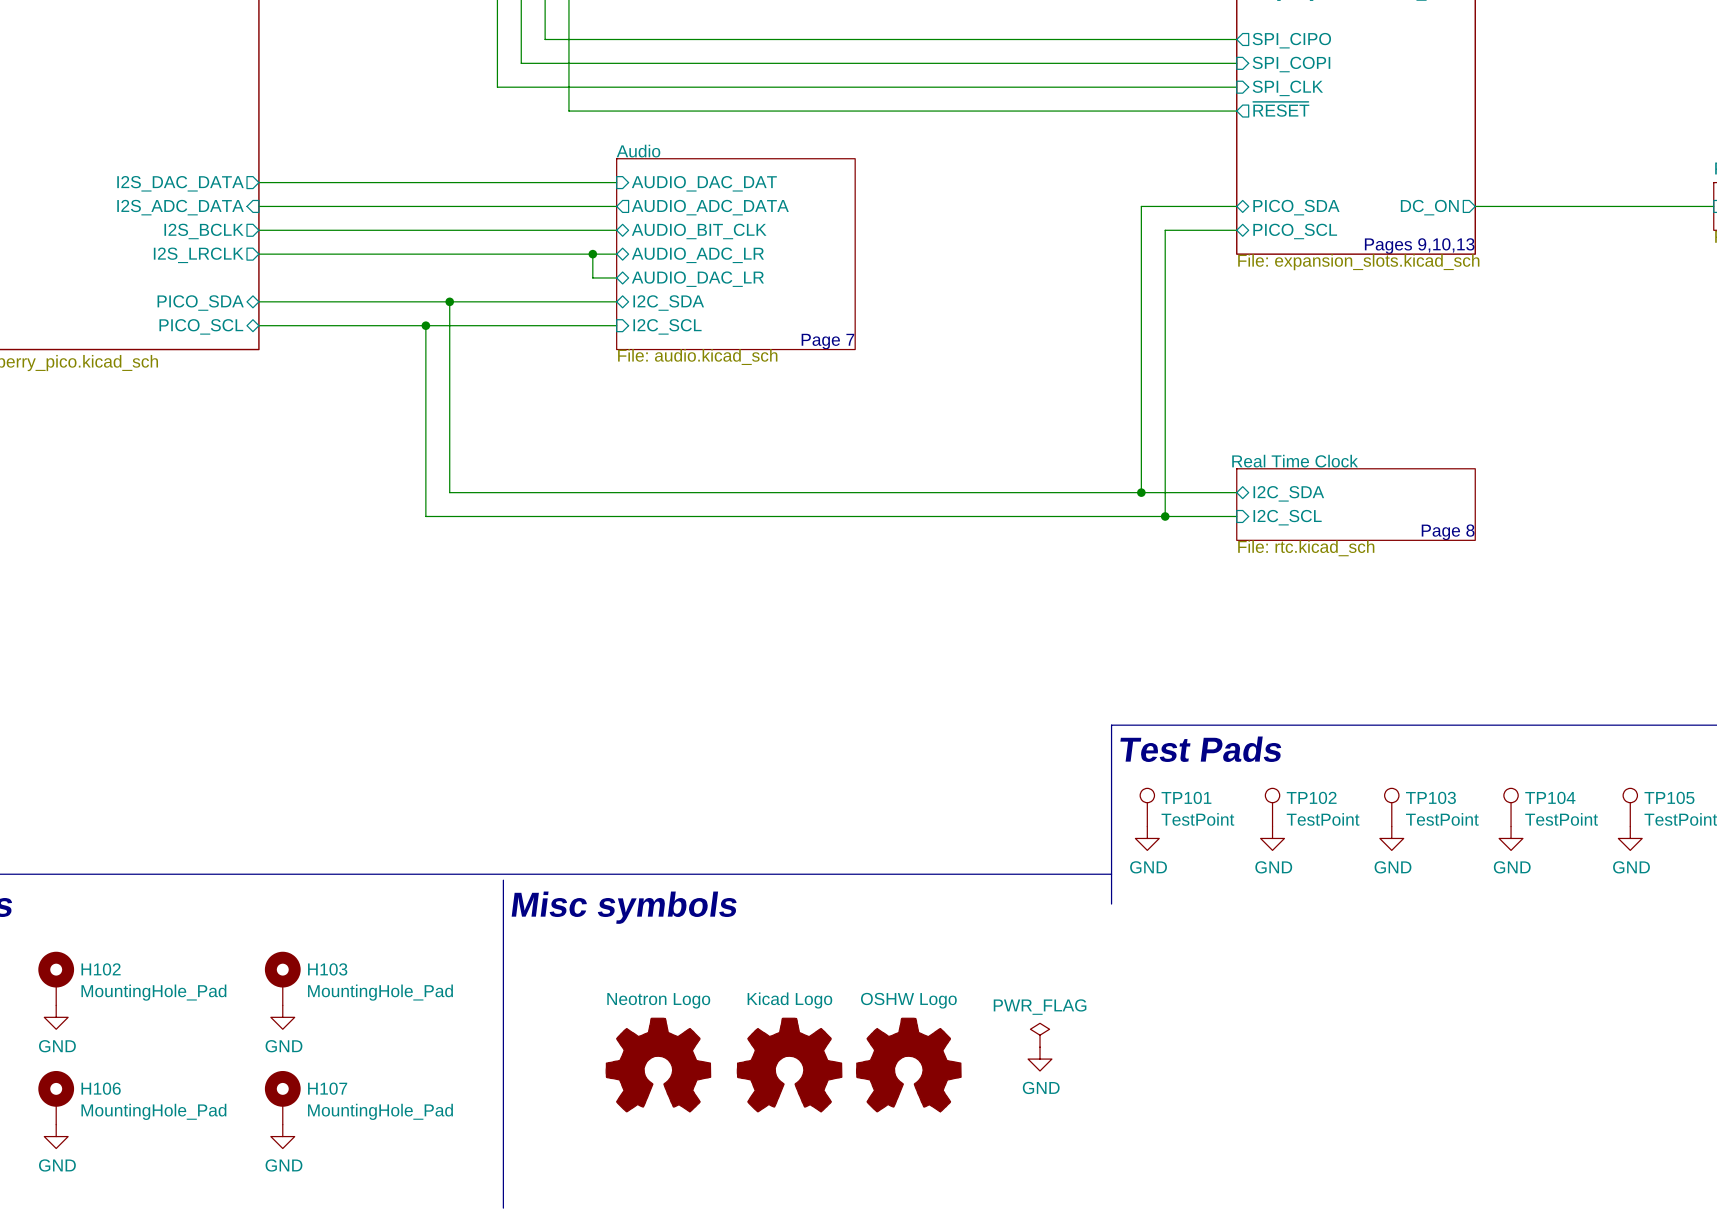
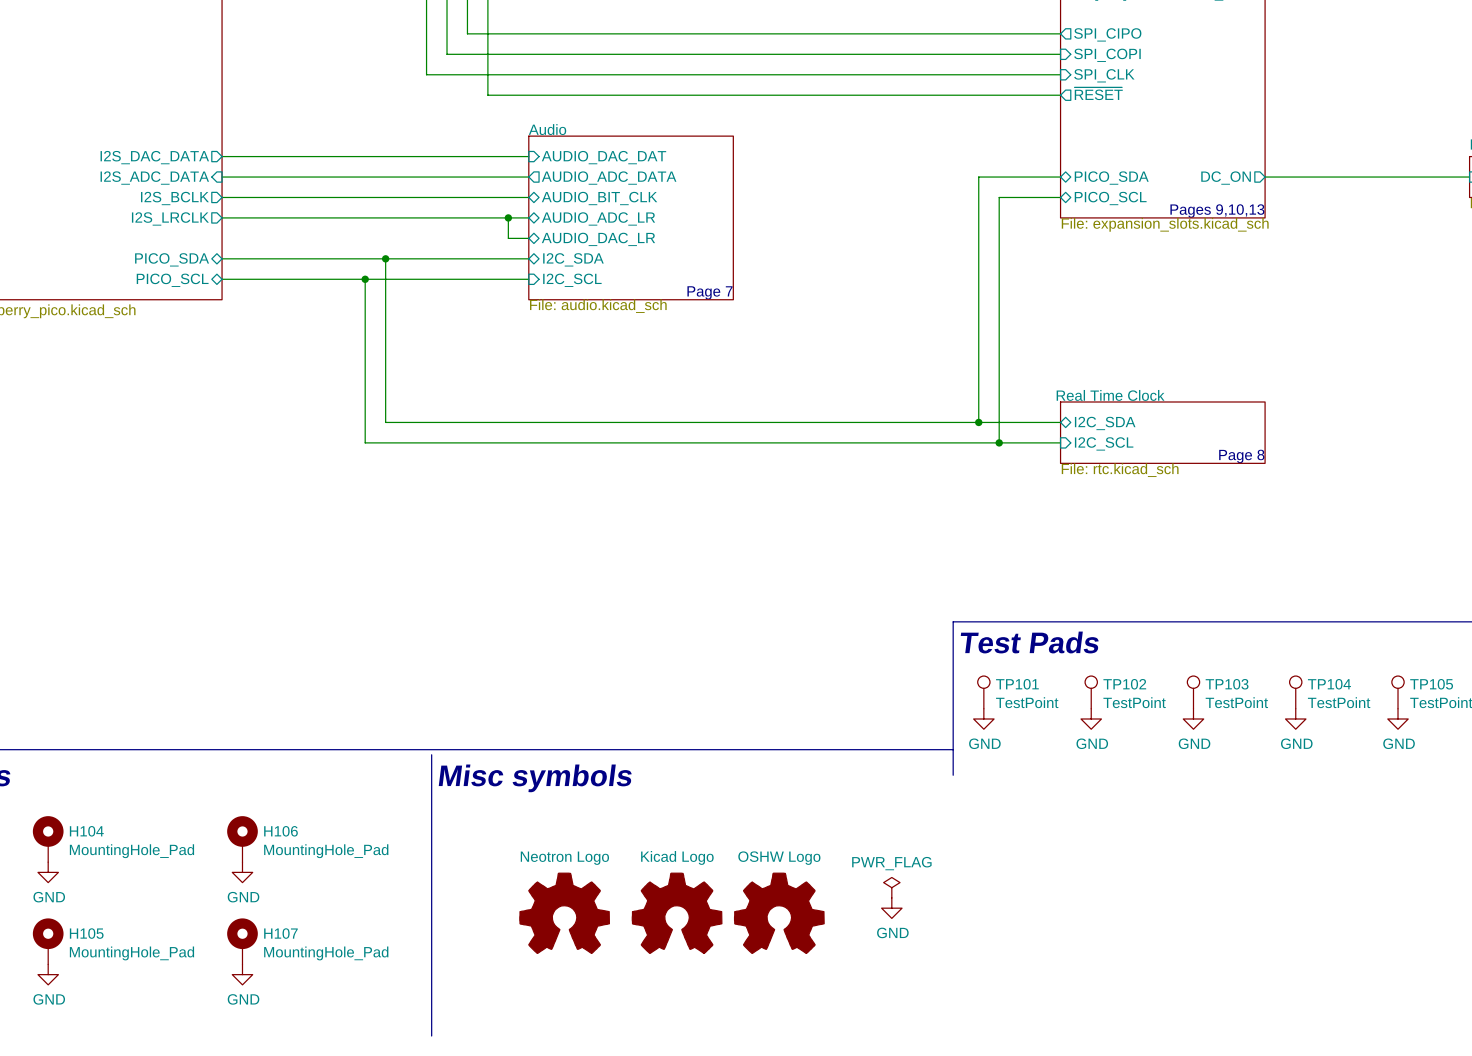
H102 name: H102 (101, 969) -> H104 (86, 831)
H103 name: H103 (327, 969) -> H106 (280, 831)
H106 name: H106 (101, 1088) -> H105 (86, 933)

